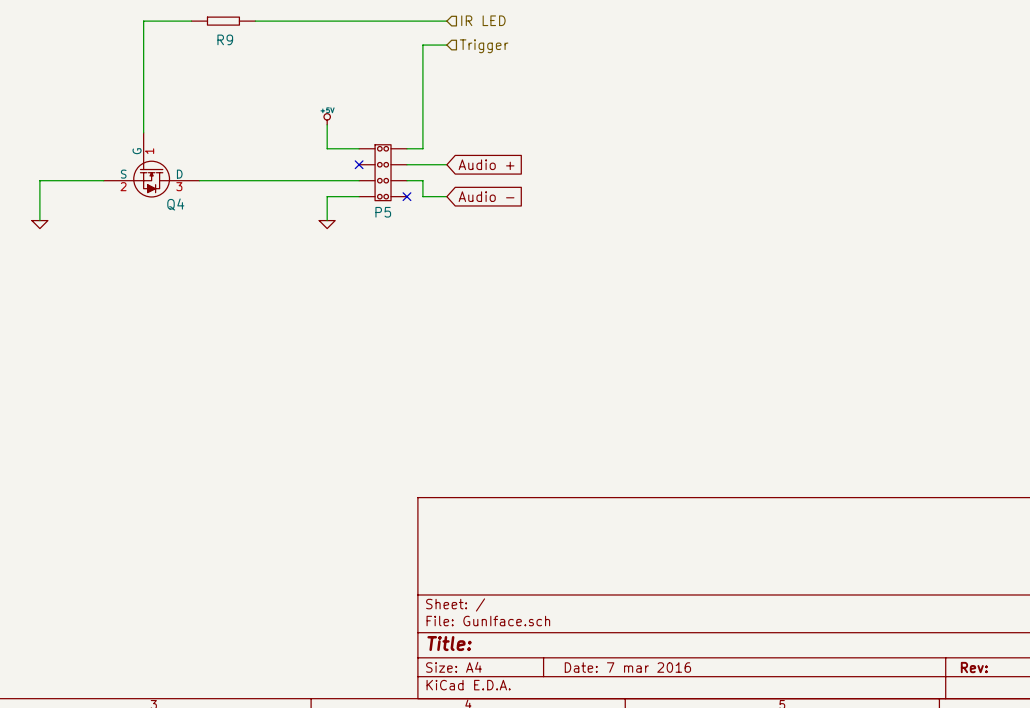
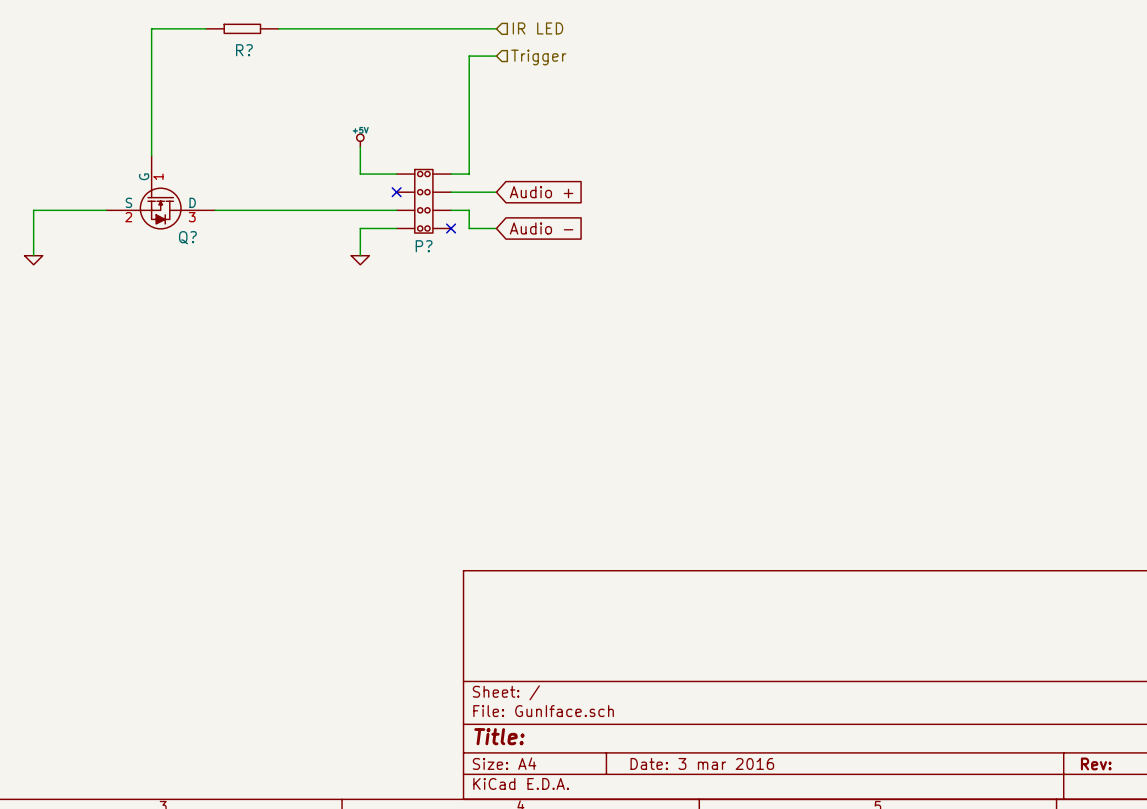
R9 name: R9 (225, 39) -> R? (244, 50)
Q4 name: Q4 (175, 204) -> Q? (187, 237)
P5 name: P5 (383, 212) -> P? (424, 246)
title block: Date: 7 mar 2016 (627, 667) -> Date: 3 mar 2016 (702, 763)

